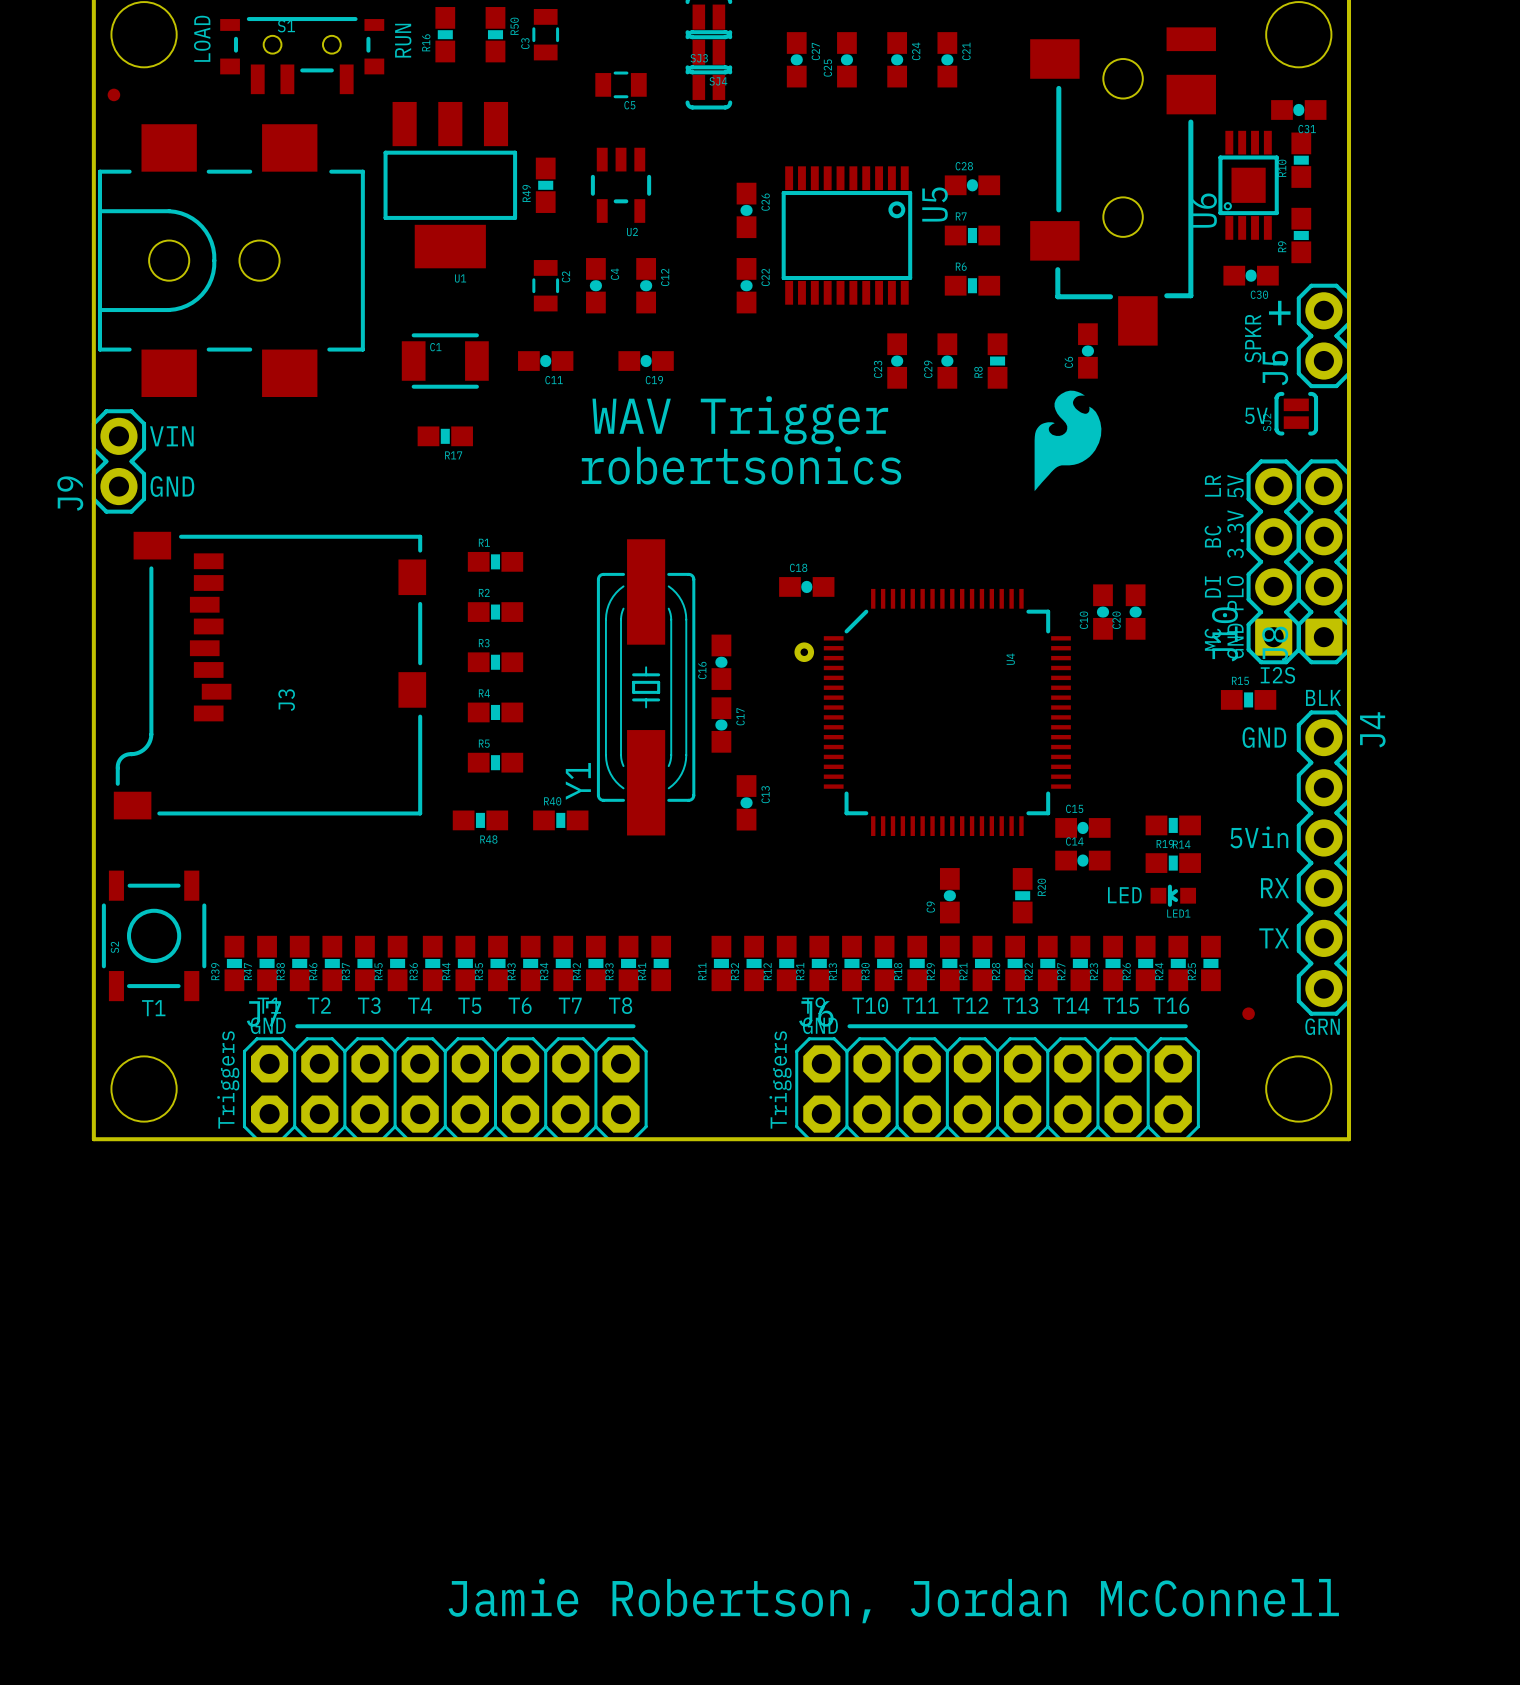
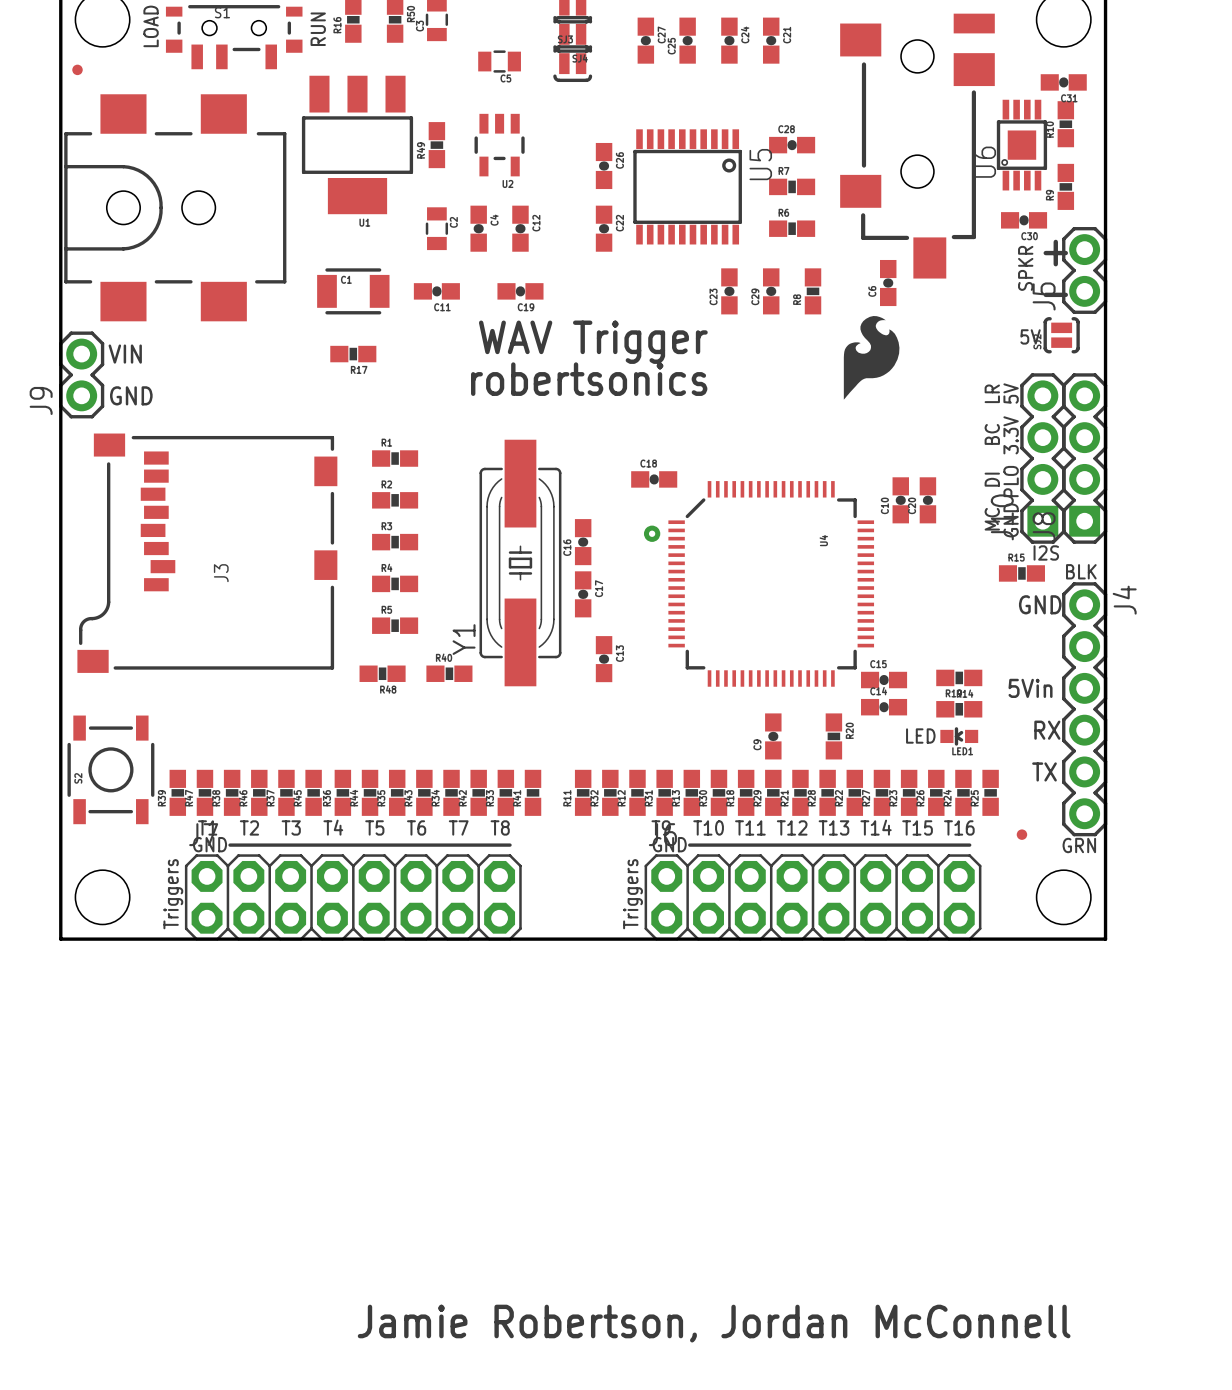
text: T1 (153, 1008) -> none

